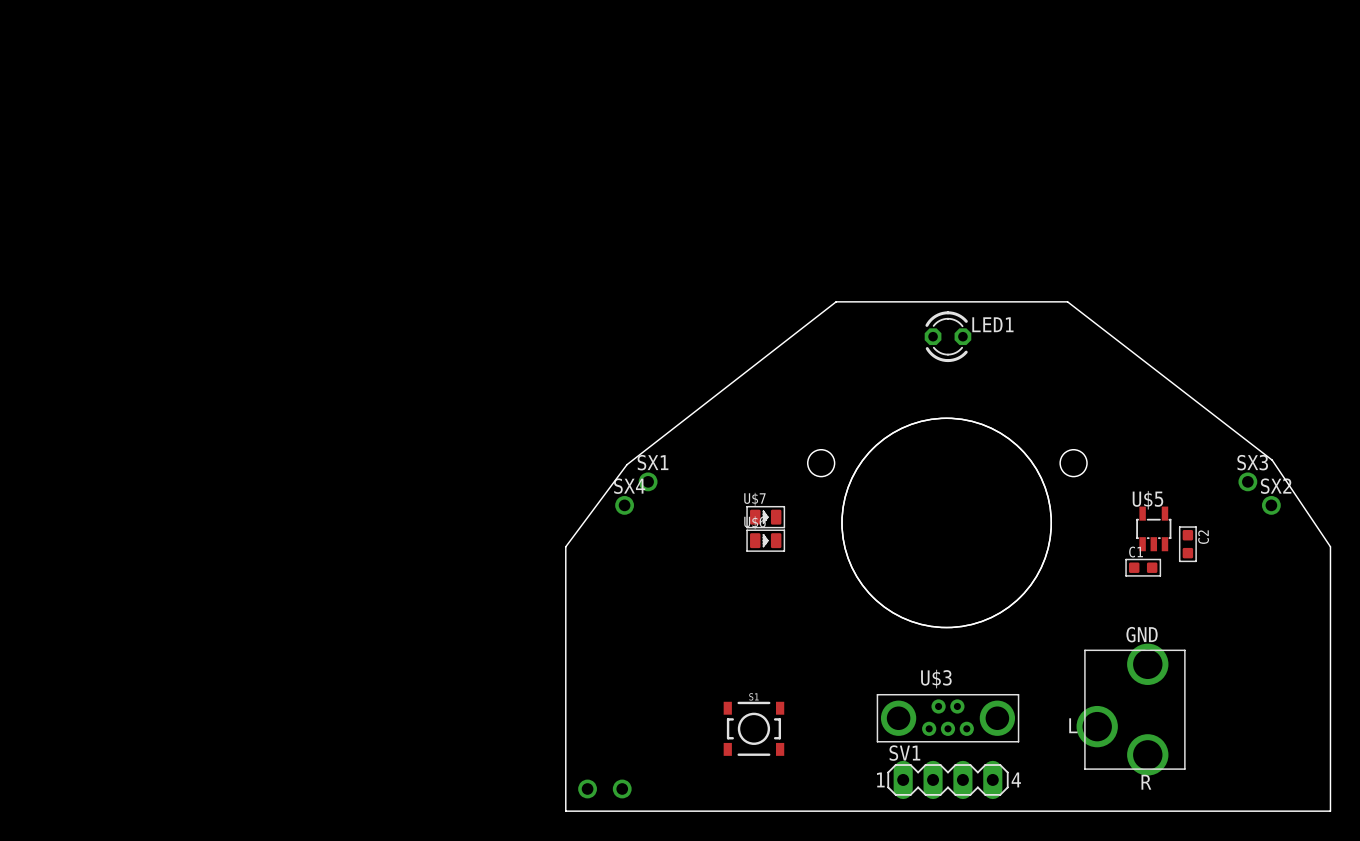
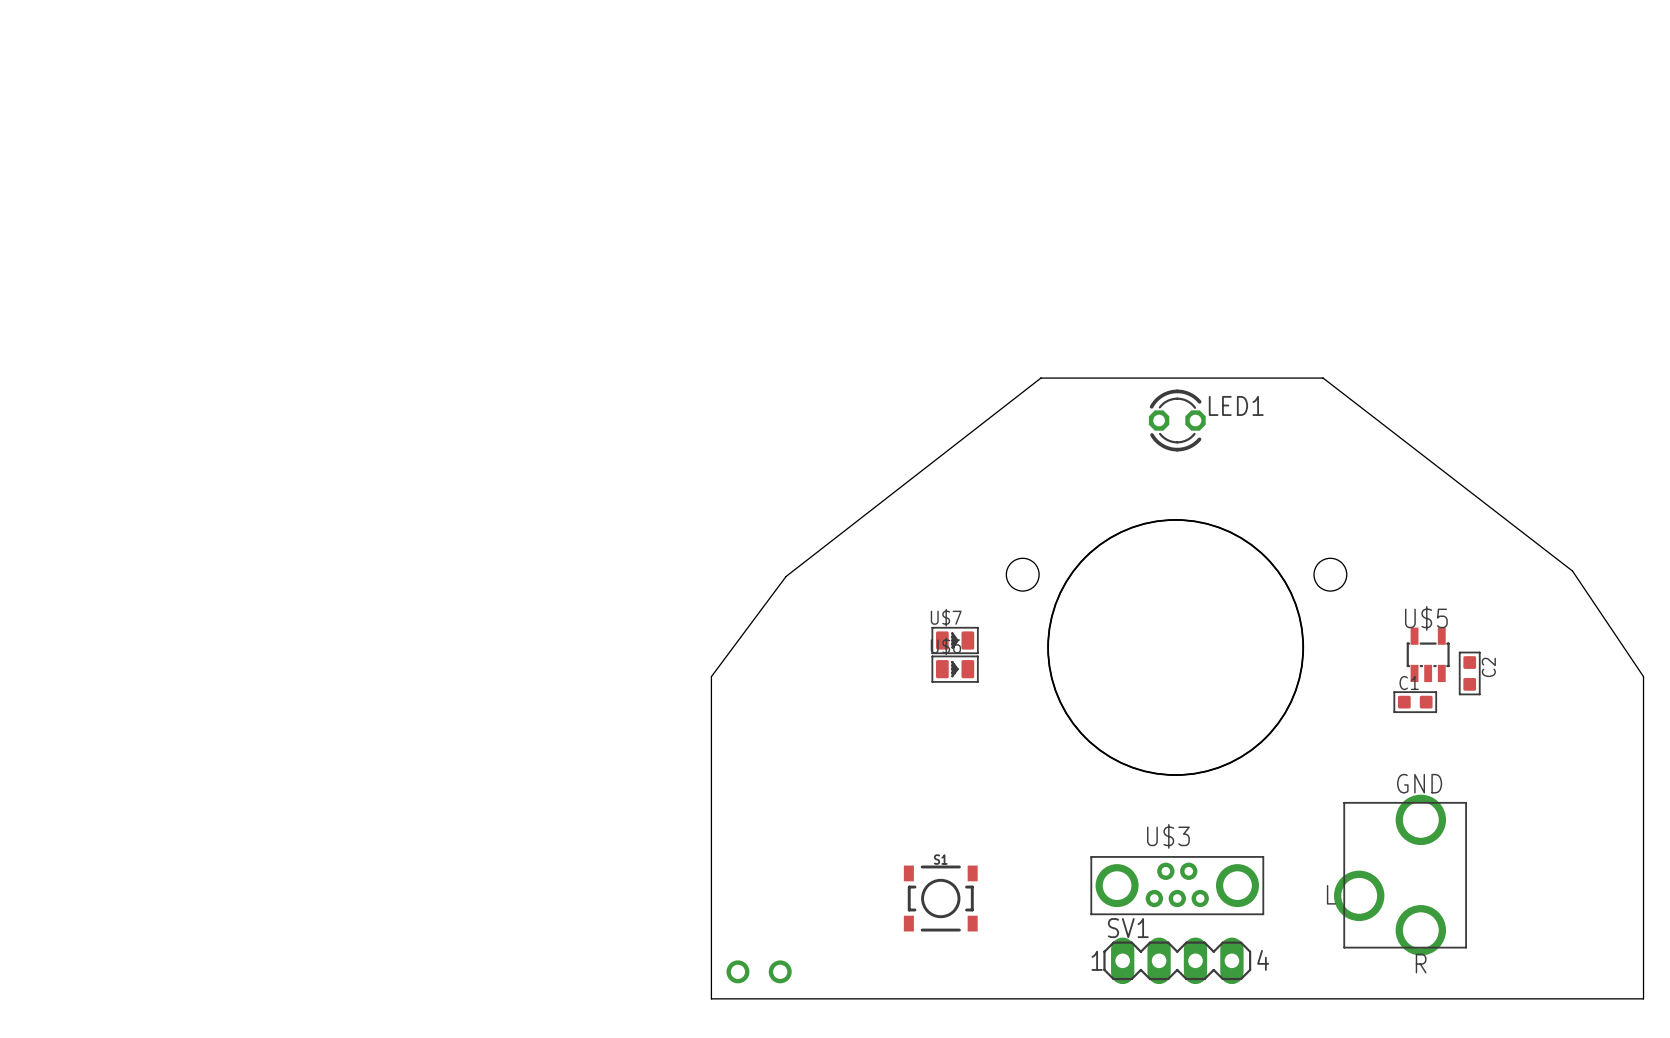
SX1: (648, 481) -> none
SX3: (1247, 481) -> none
SX4: (624, 505) -> none
SX2: (1271, 505) -> none

